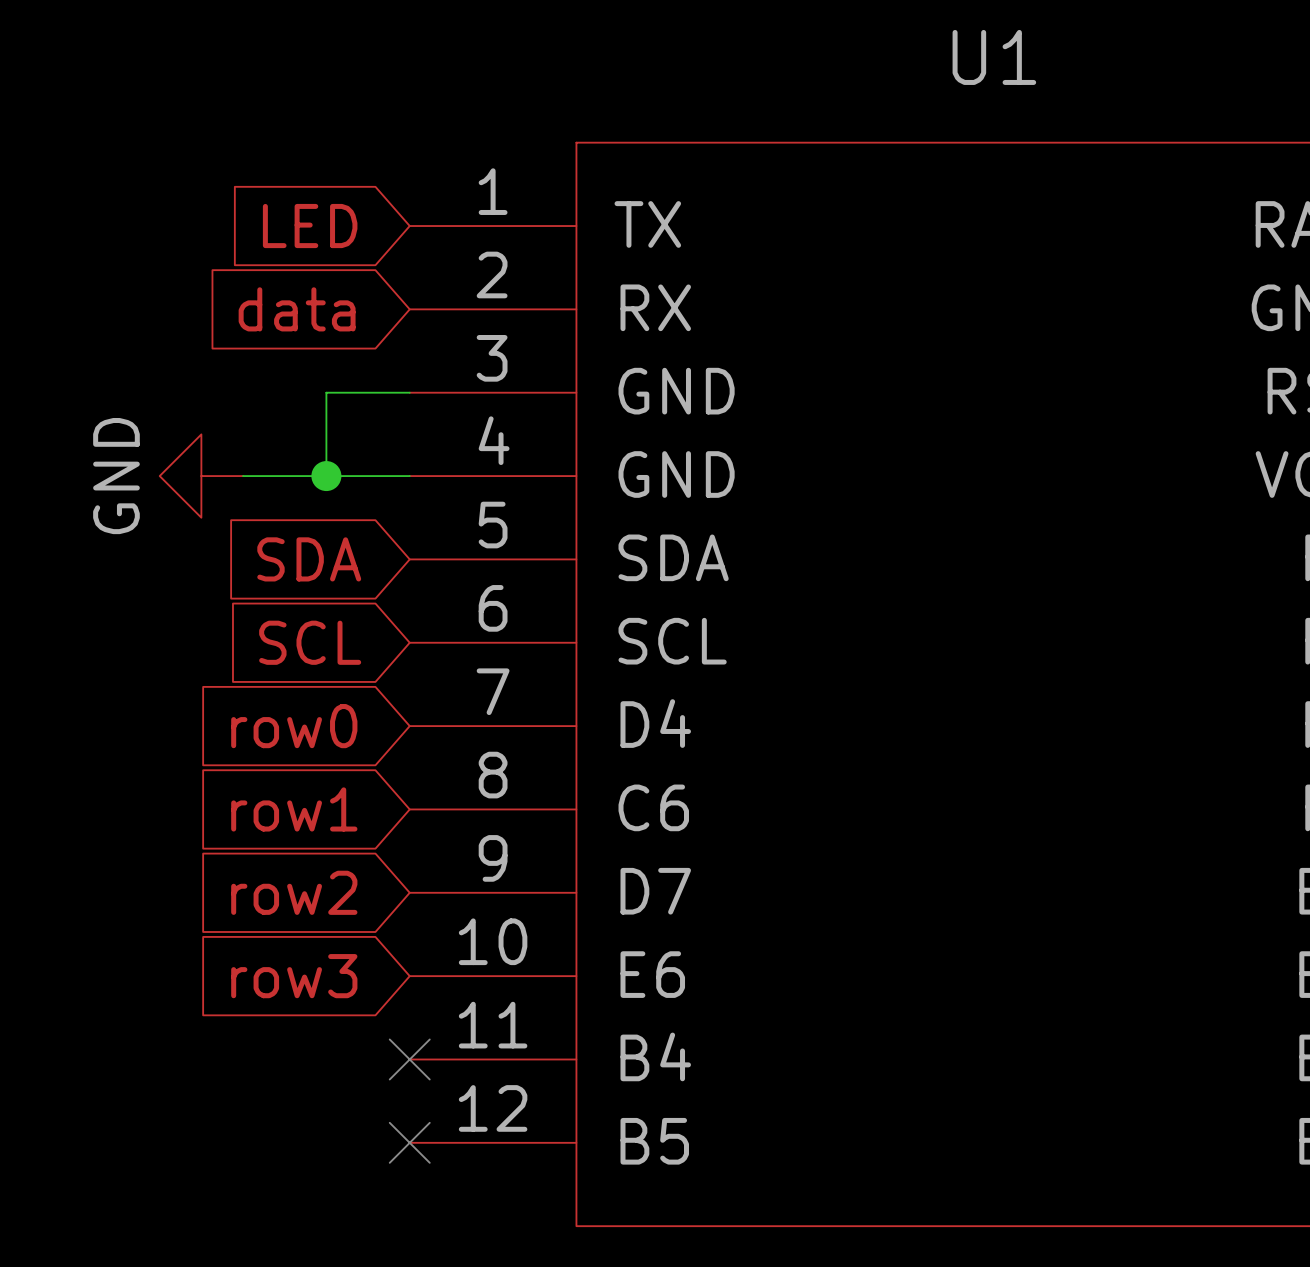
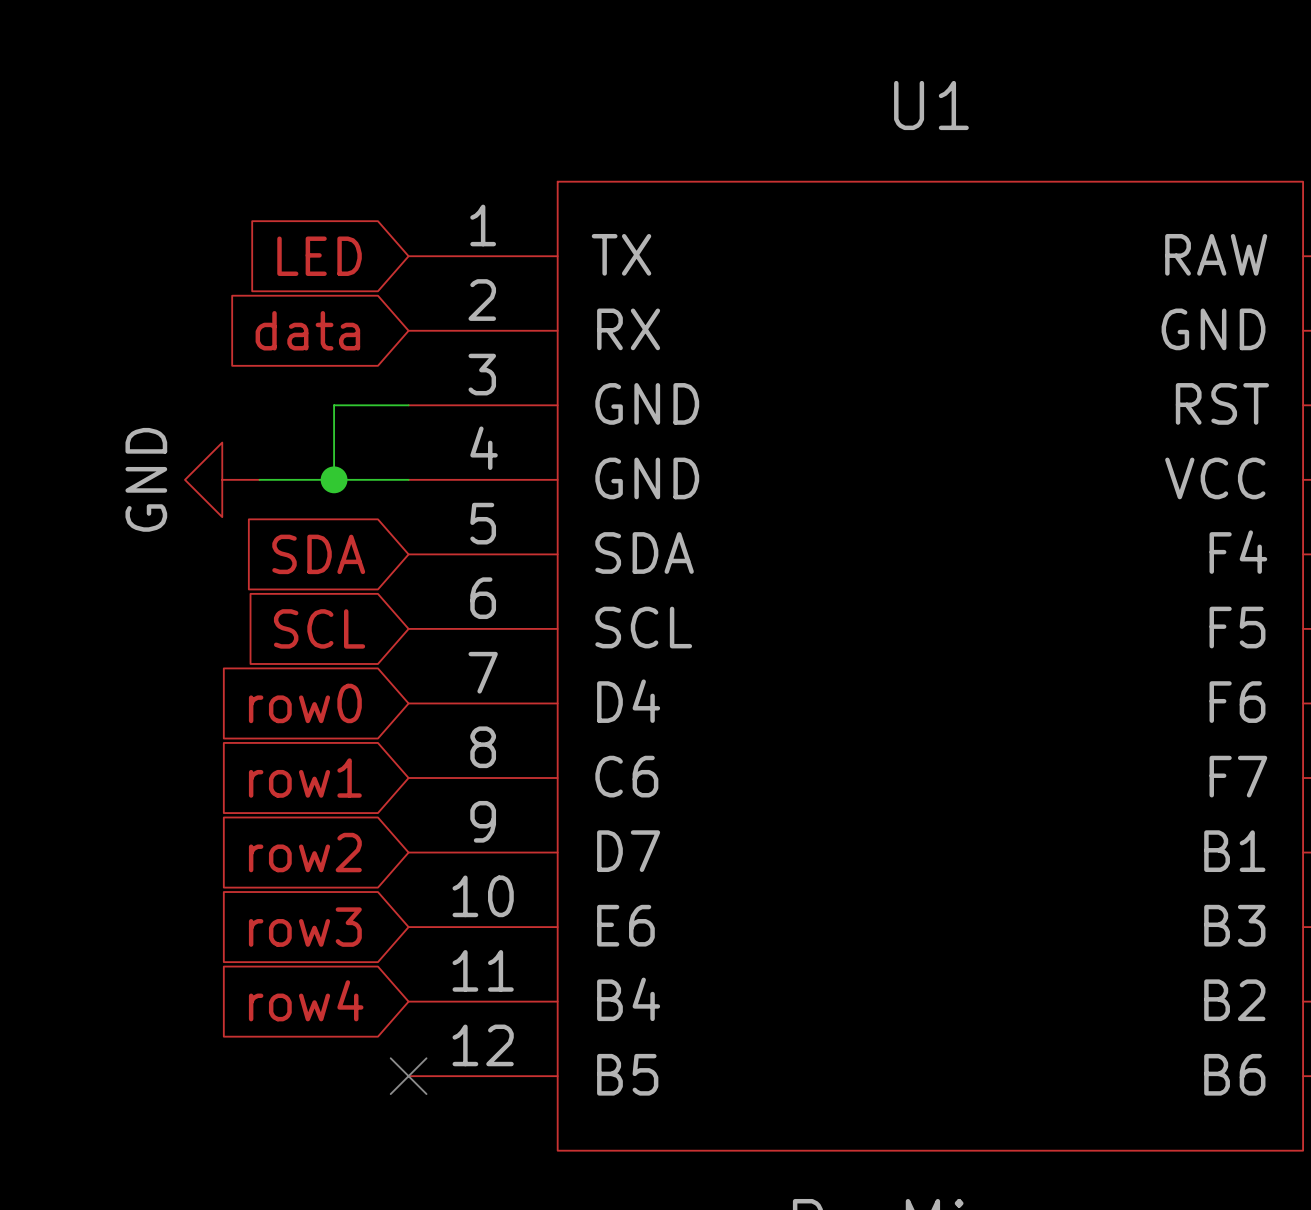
global label: none -> row4 (306, 1000)
no-connect mark: (409, 1059) -> none

